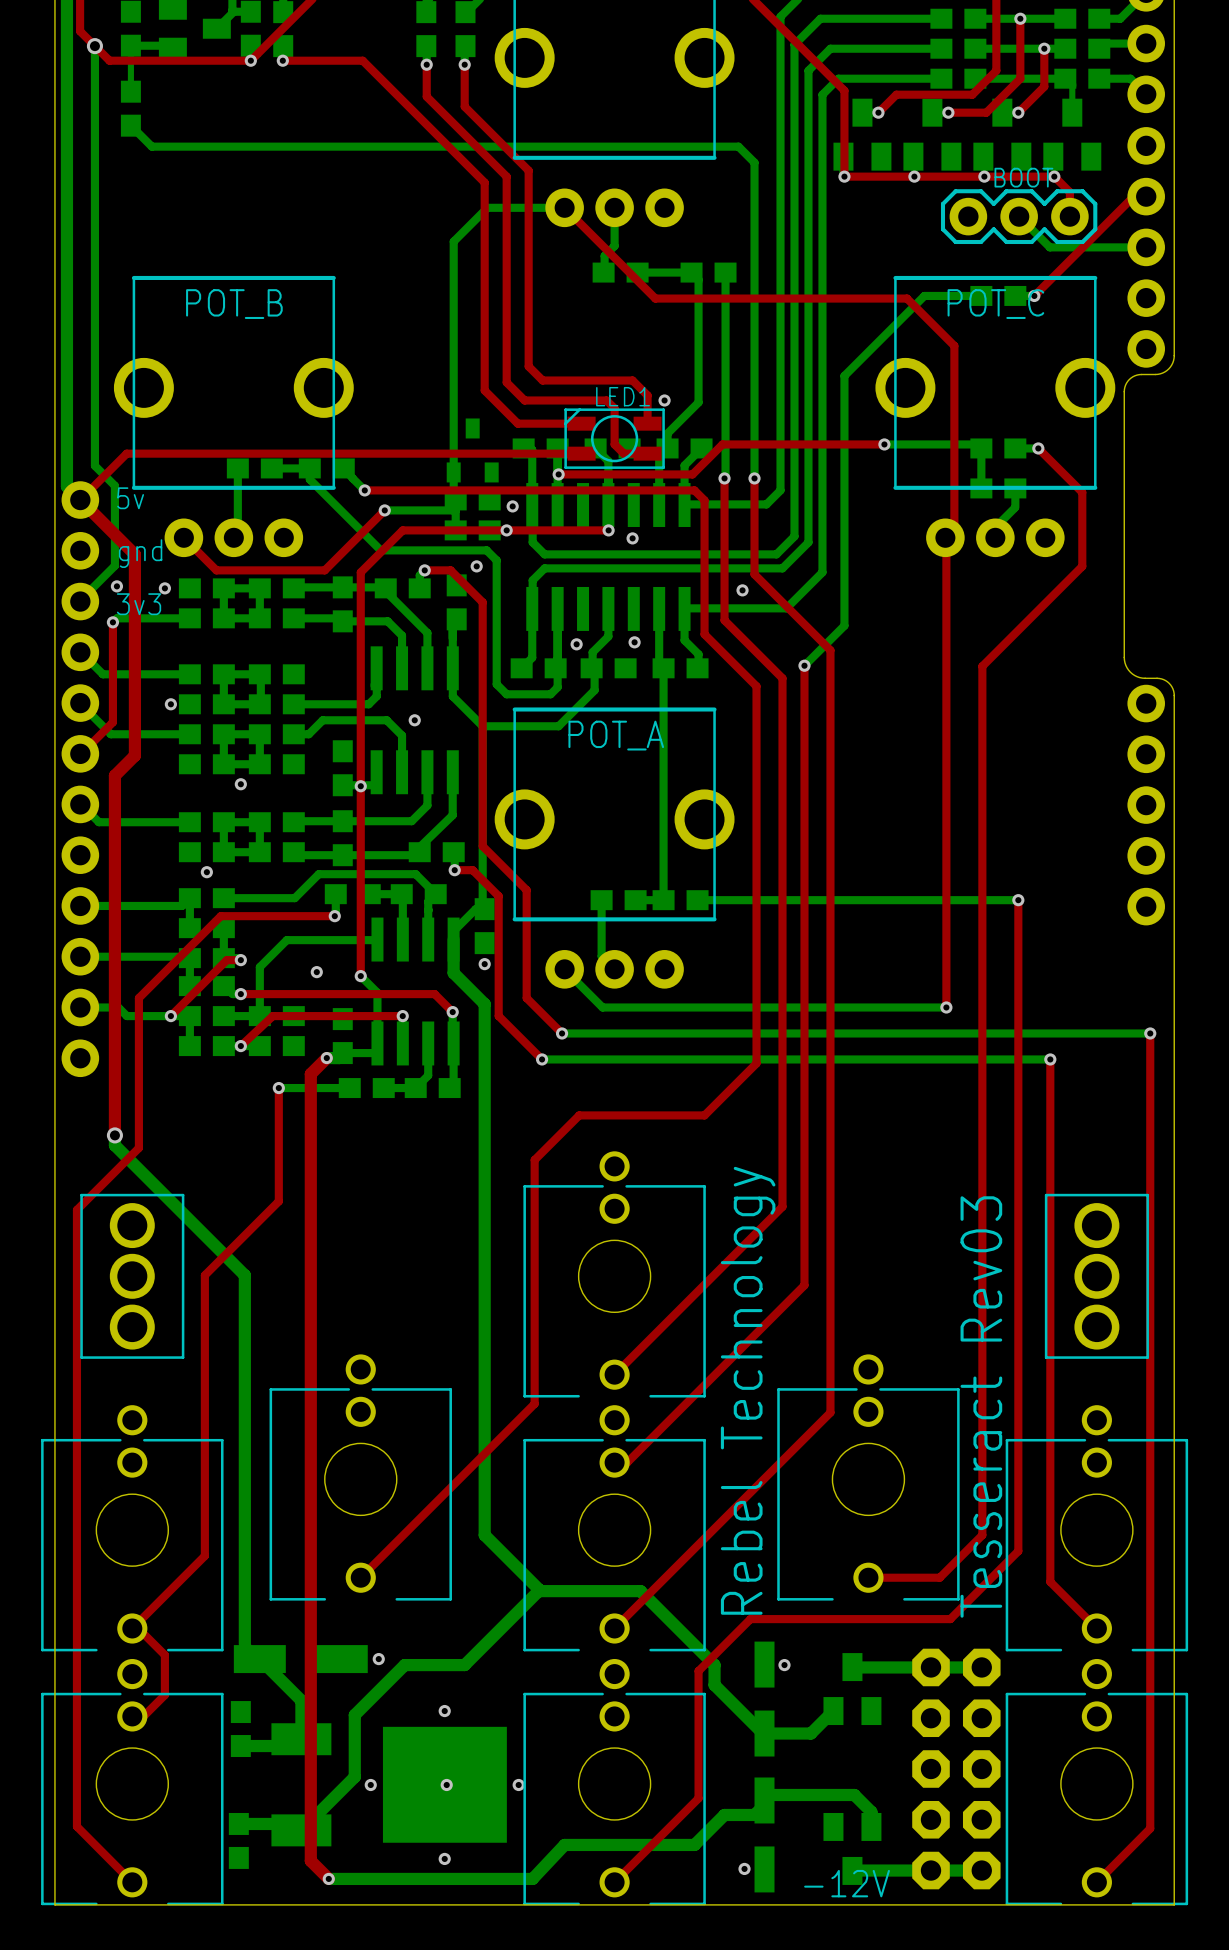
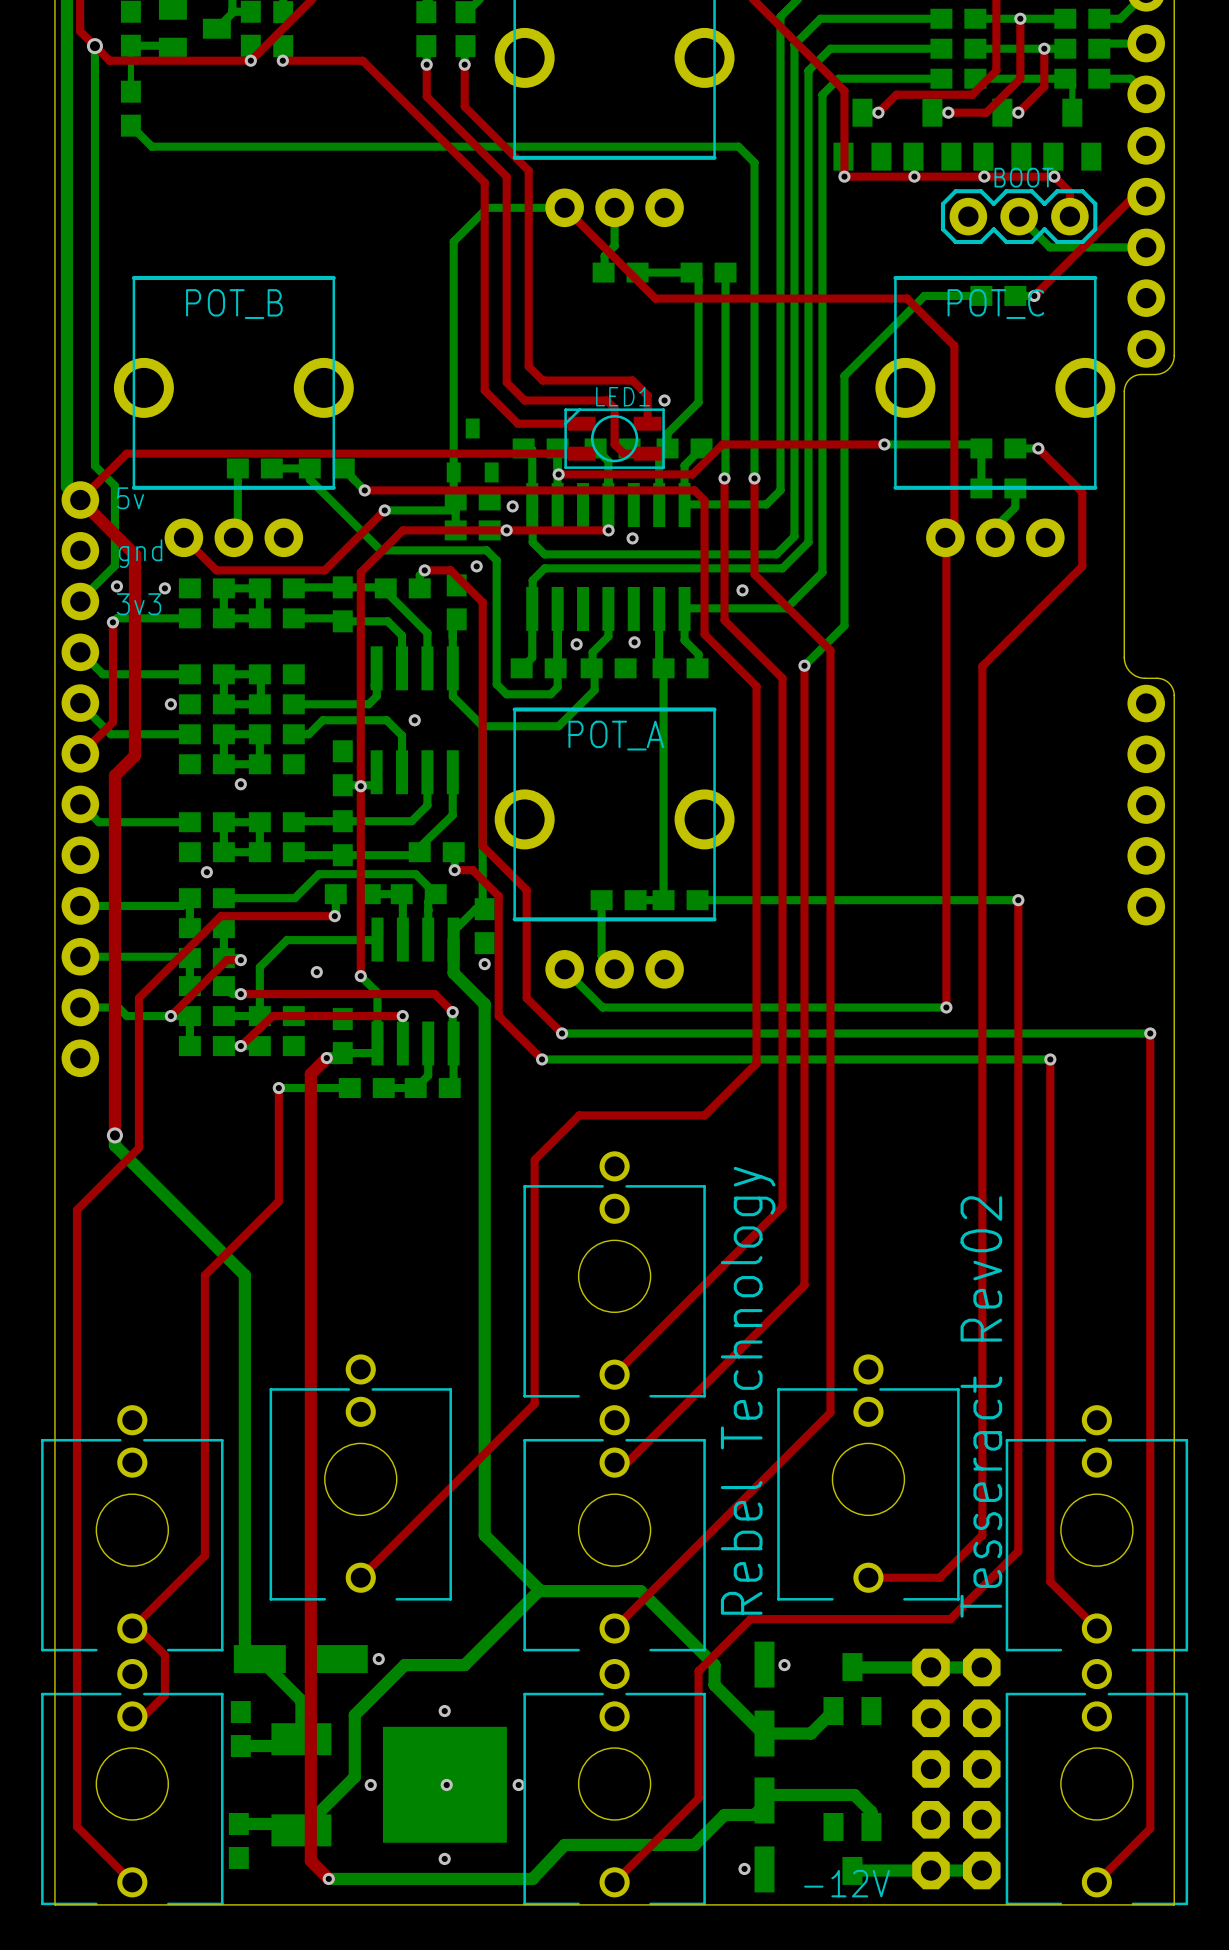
part: (132, 1276) -> none
part: (1096, 1276) -> none
text: Tesseract Rev03 (981, 1406) -> Tesseract Rev02 (981, 1406)

